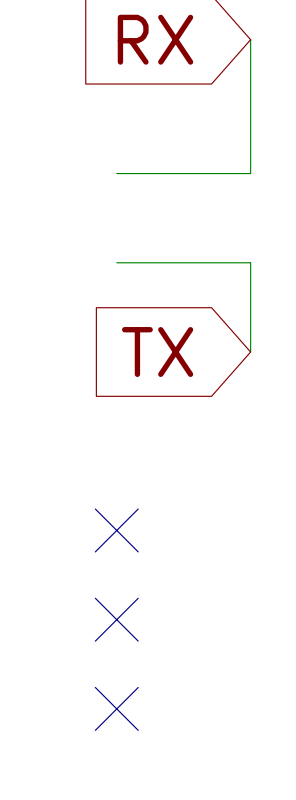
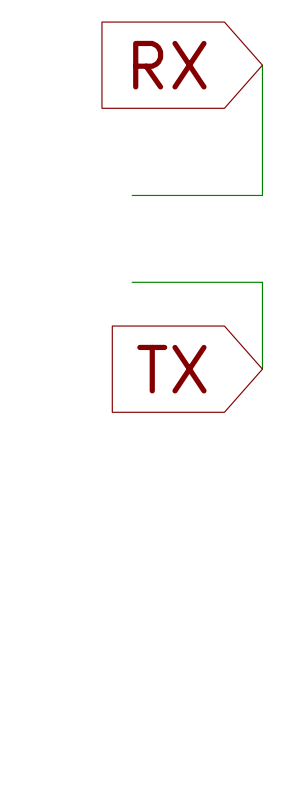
no-connect mark: (116, 530) -> none
no-connect mark: (116, 619) -> none
no-connect mark: (116, 708) -> none

